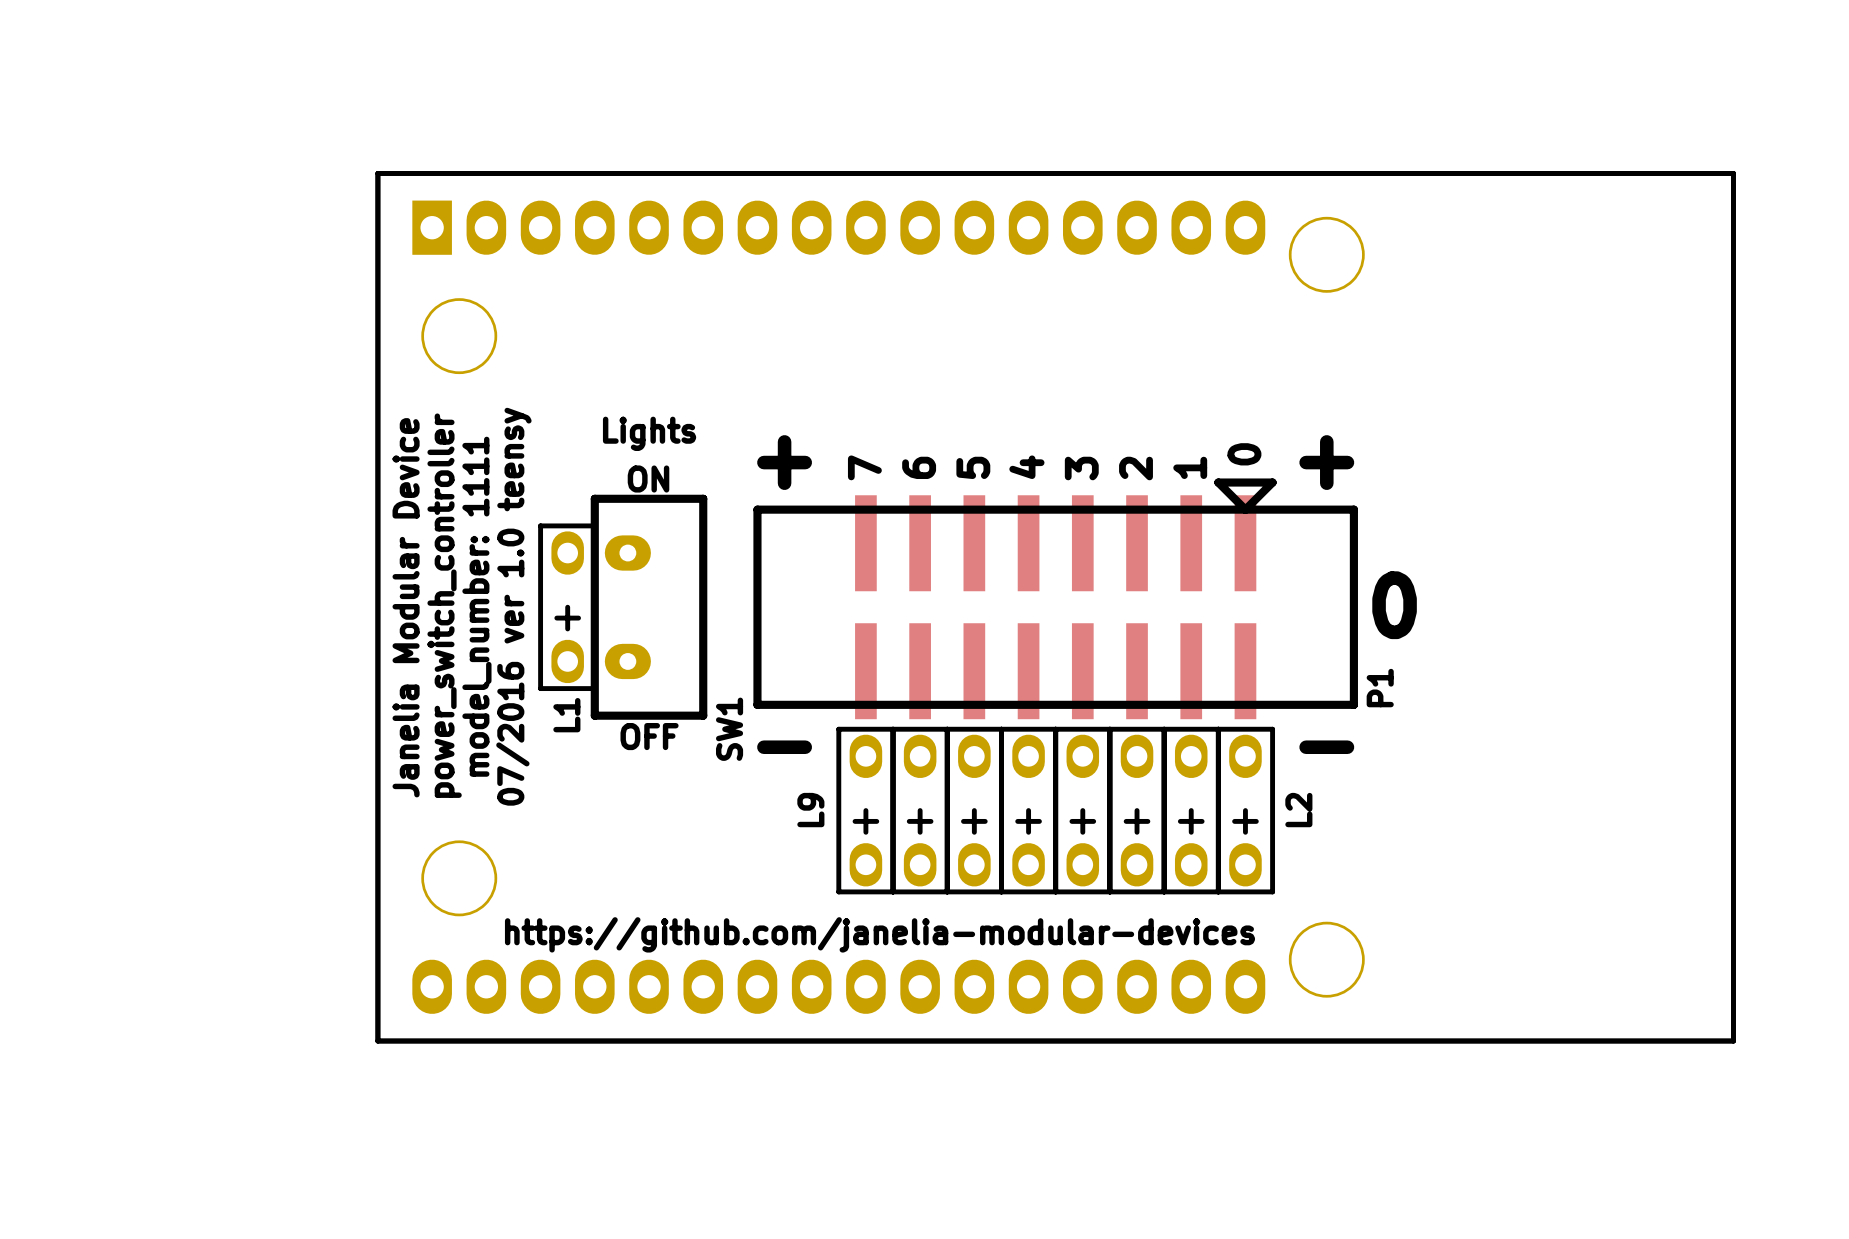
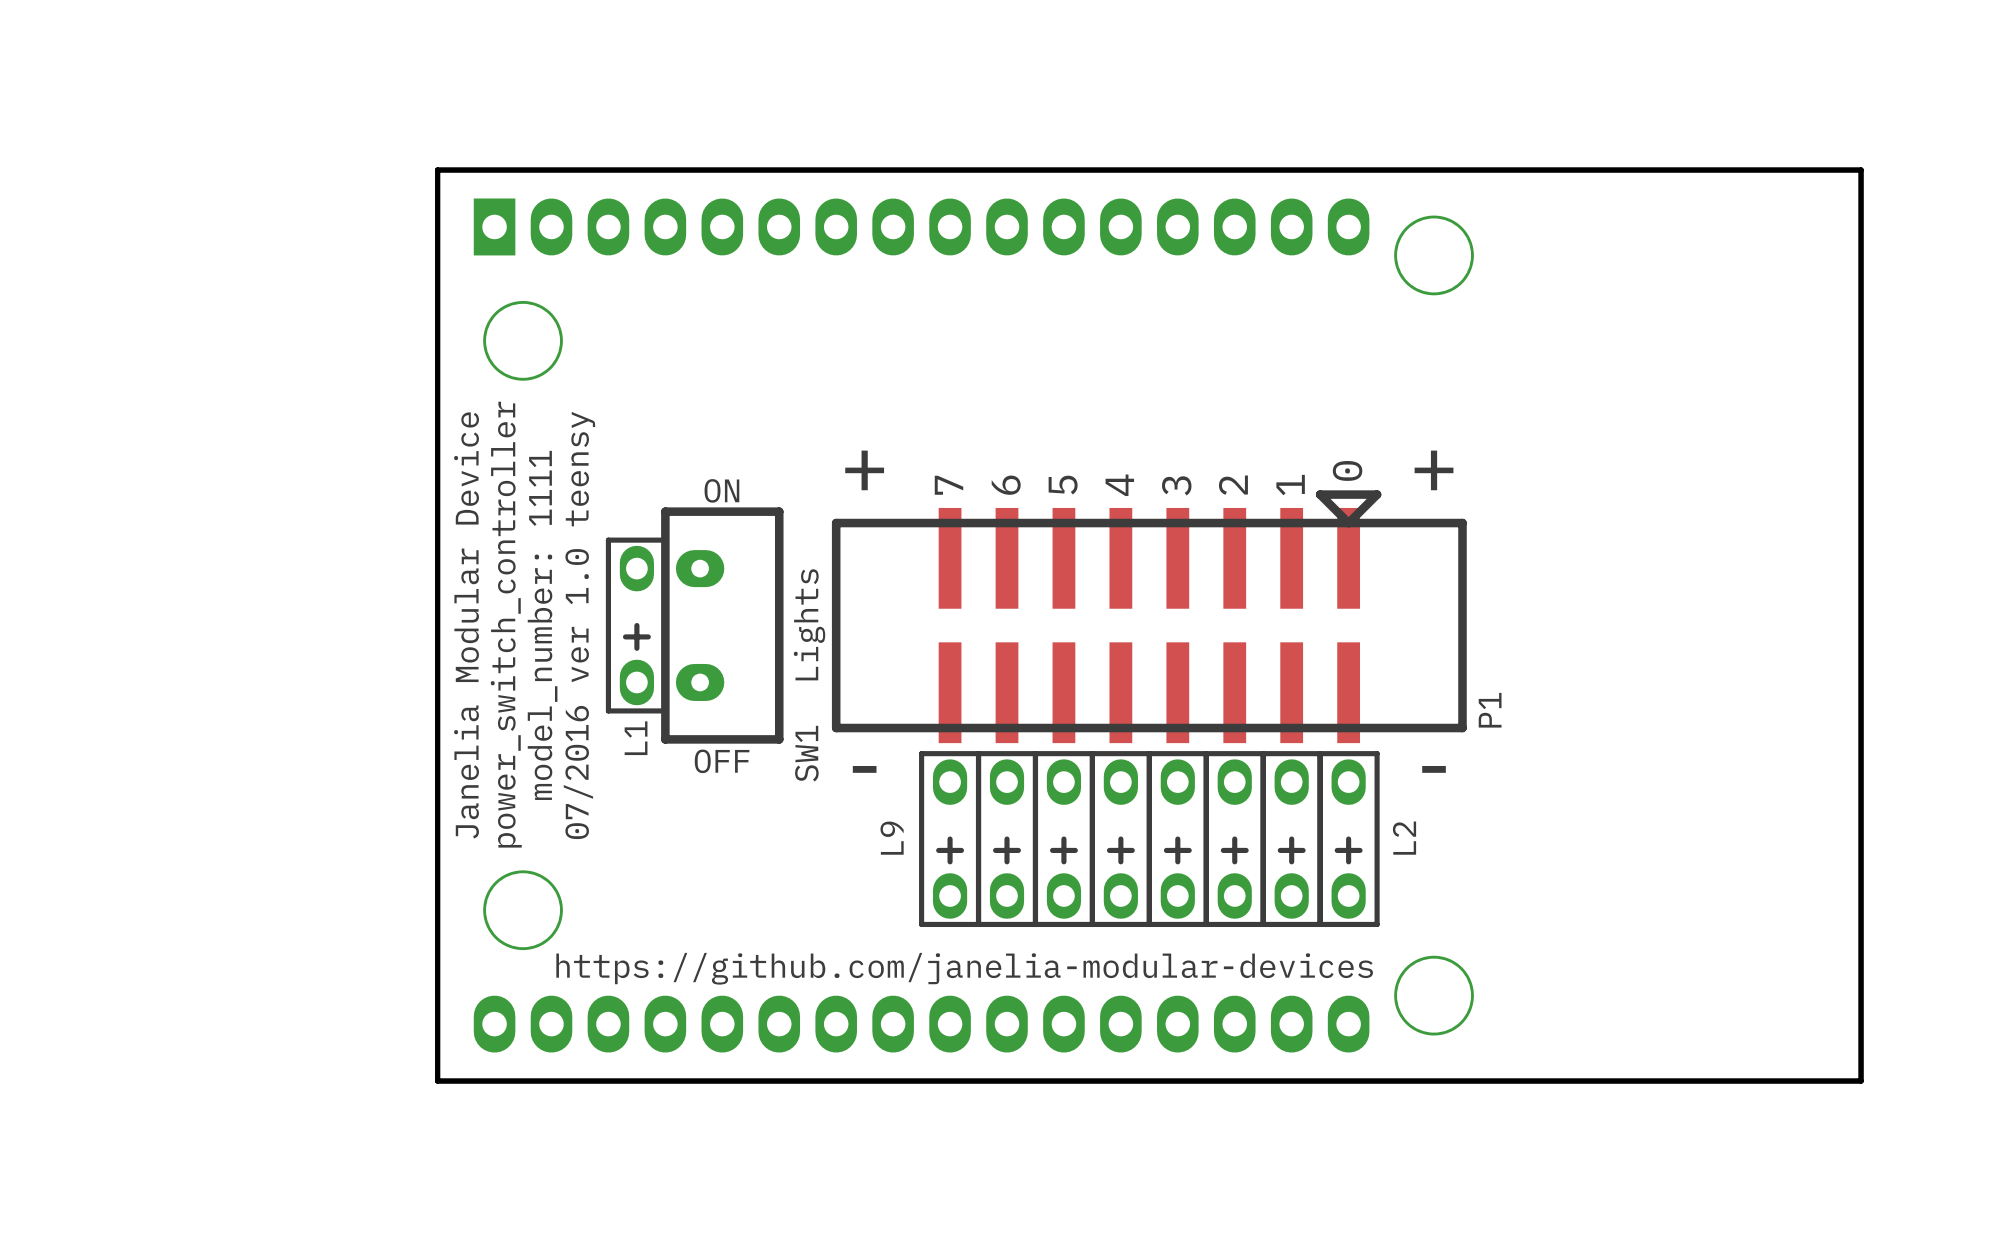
text rotation: 0° (649, 433) -> 90° counterclockwise (809, 624)
text position: Lights (649, 433) -> Lights (809, 624)
text: 0 (1394, 605) -> none

